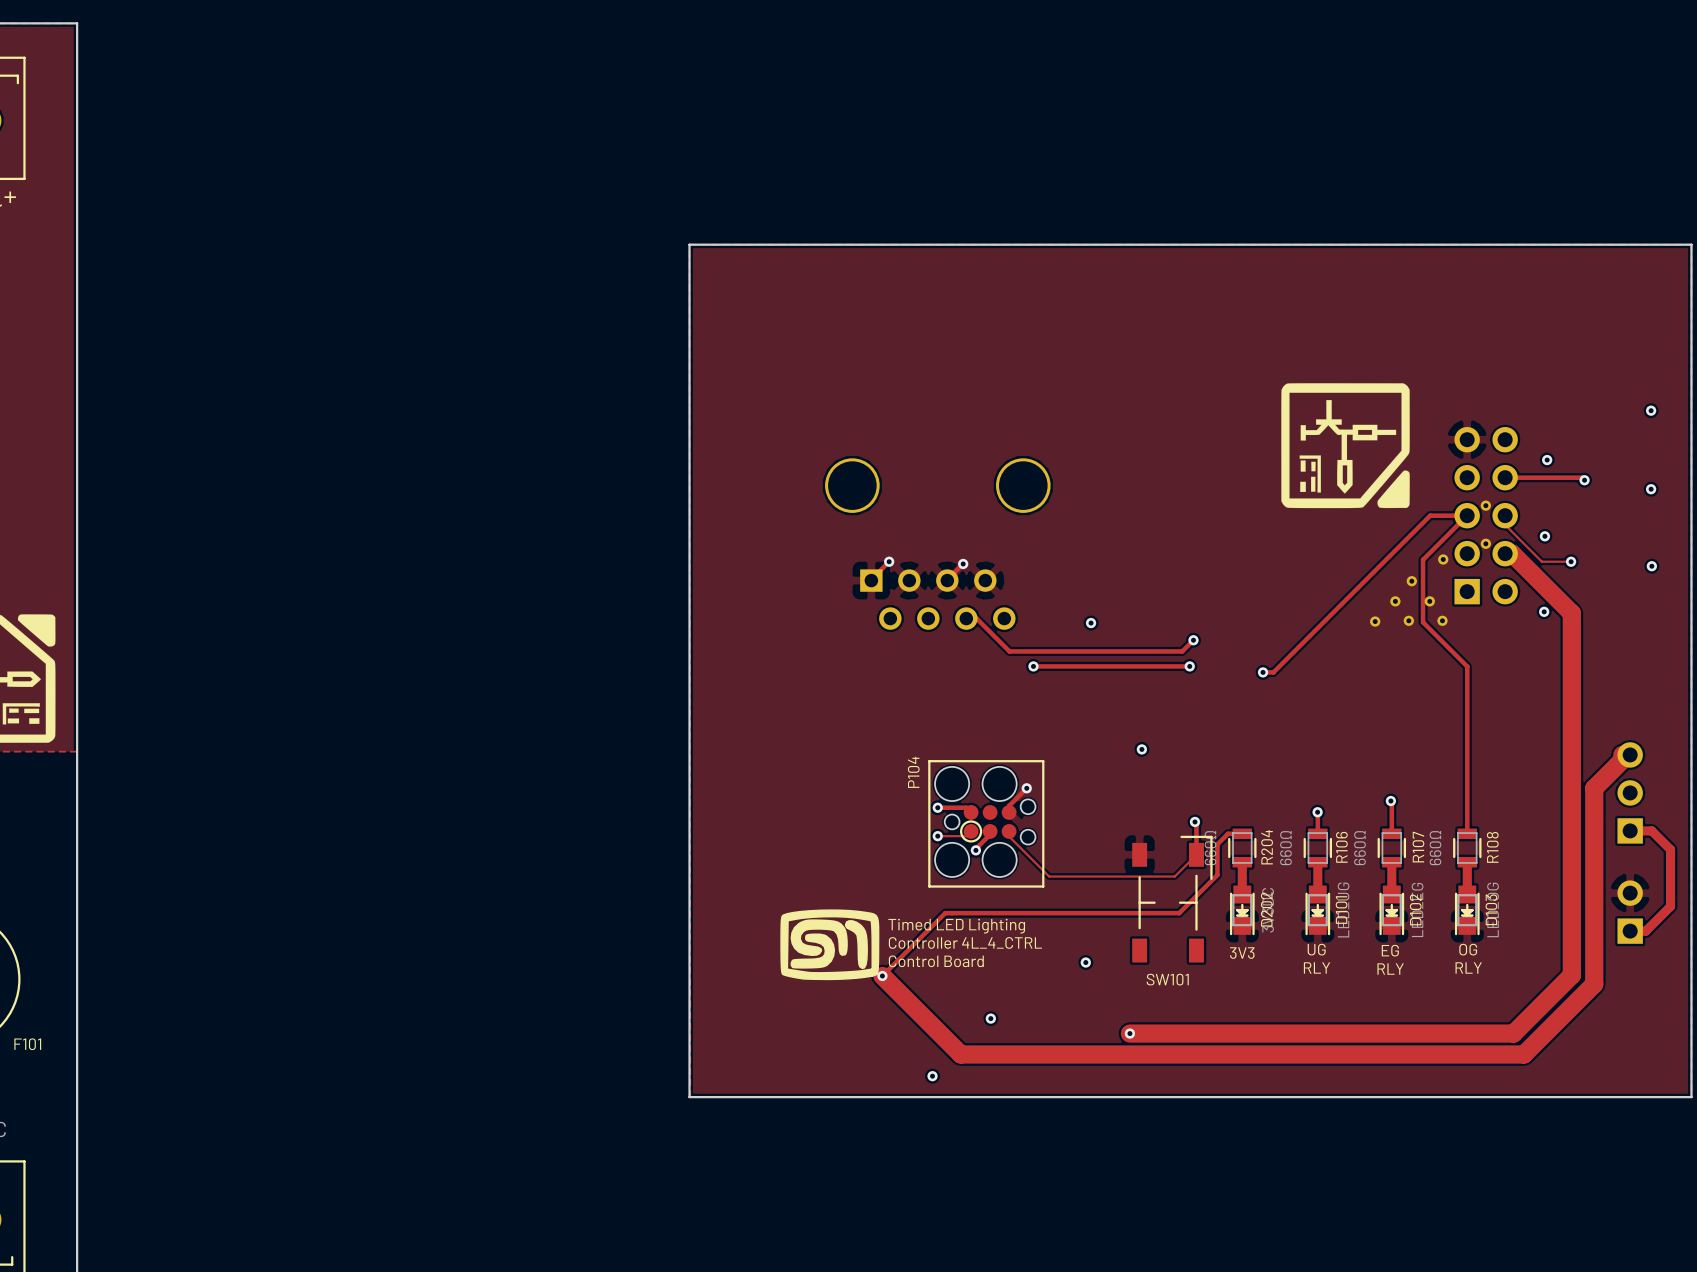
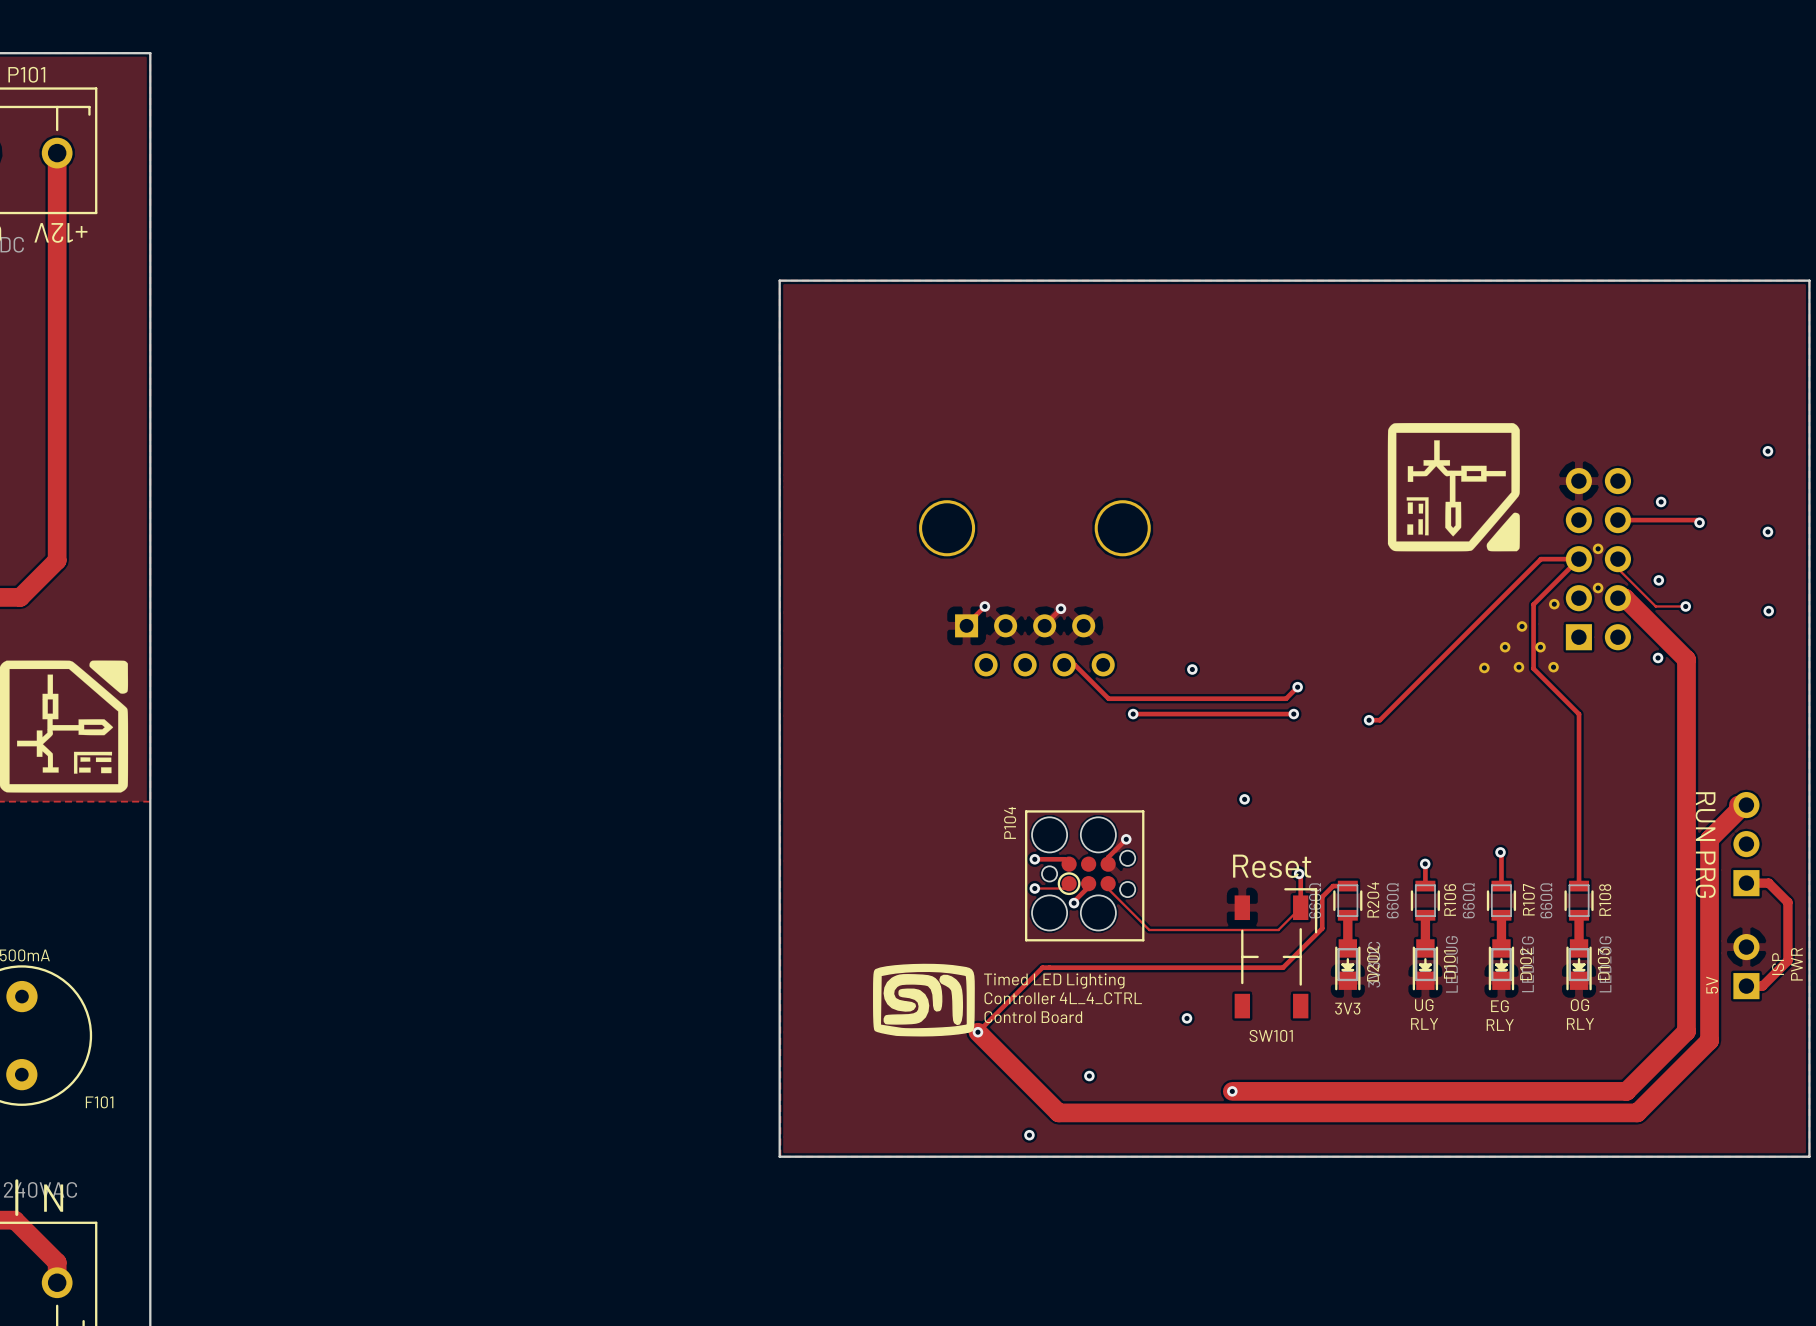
text: none -> RUN PRG (1705, 845)
text: none -> Reset (1272, 866)
text: none -> ISP (1778, 964)
text: none -> PWR (1796, 964)
text: none -> 5V (1712, 985)

